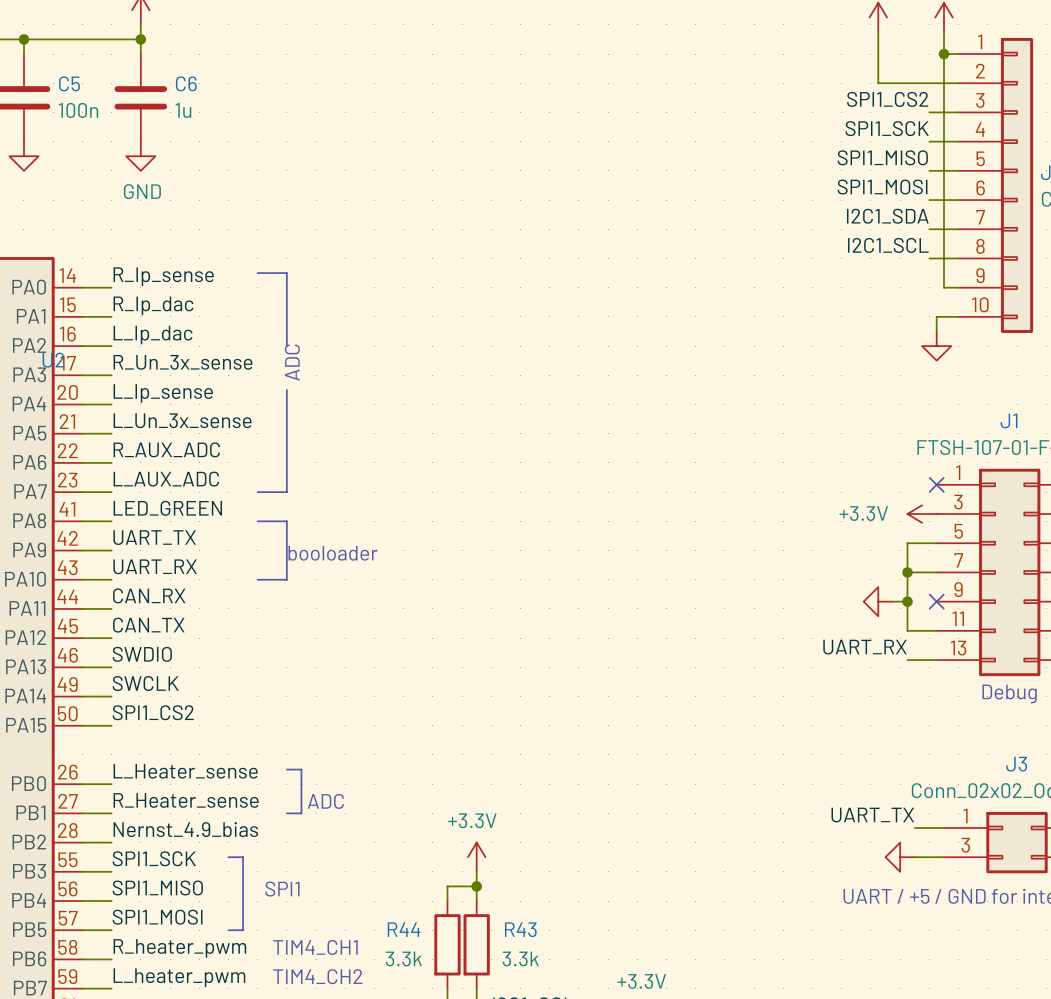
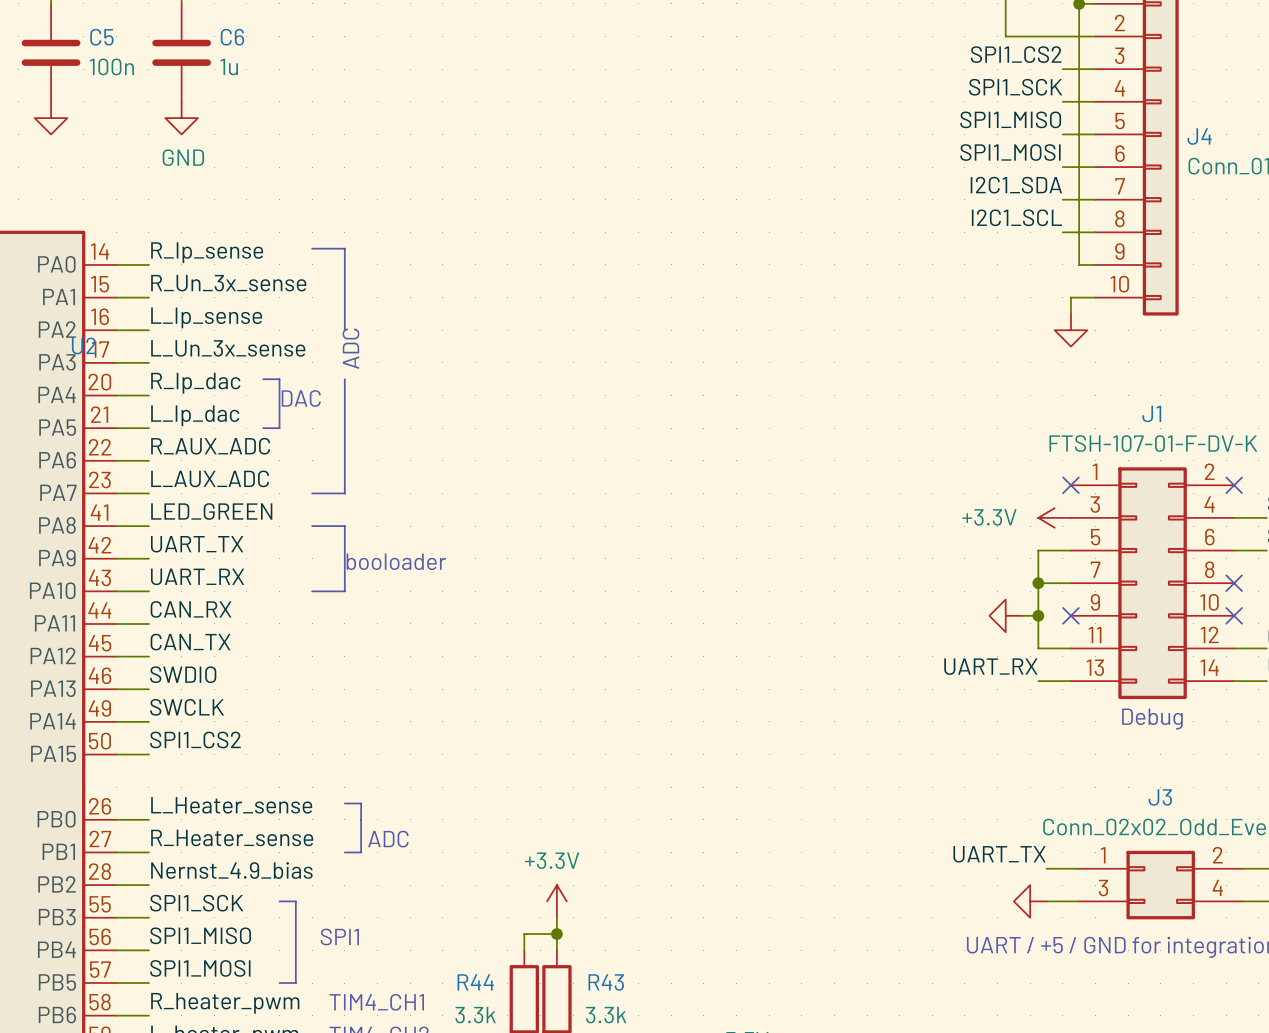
label: R_Ip_dac (153, 305) -> R_Un_3x_sense (228, 283)
label: L_Ip_dac (153, 335) -> L_Ip_sense (206, 317)
label: R_Un_3x_sense (182, 362) -> L_Un_3x_sense (228, 348)
line: none -> (263, 379) (279, 379) (279, 428) (263, 428)
label: L_Ip_sense (163, 393) -> R_Ip_dac (195, 383)
text: none -> DAC (301, 398)
label: L_Un_3x_sense (182, 420) -> L_Ip_dac (195, 415)

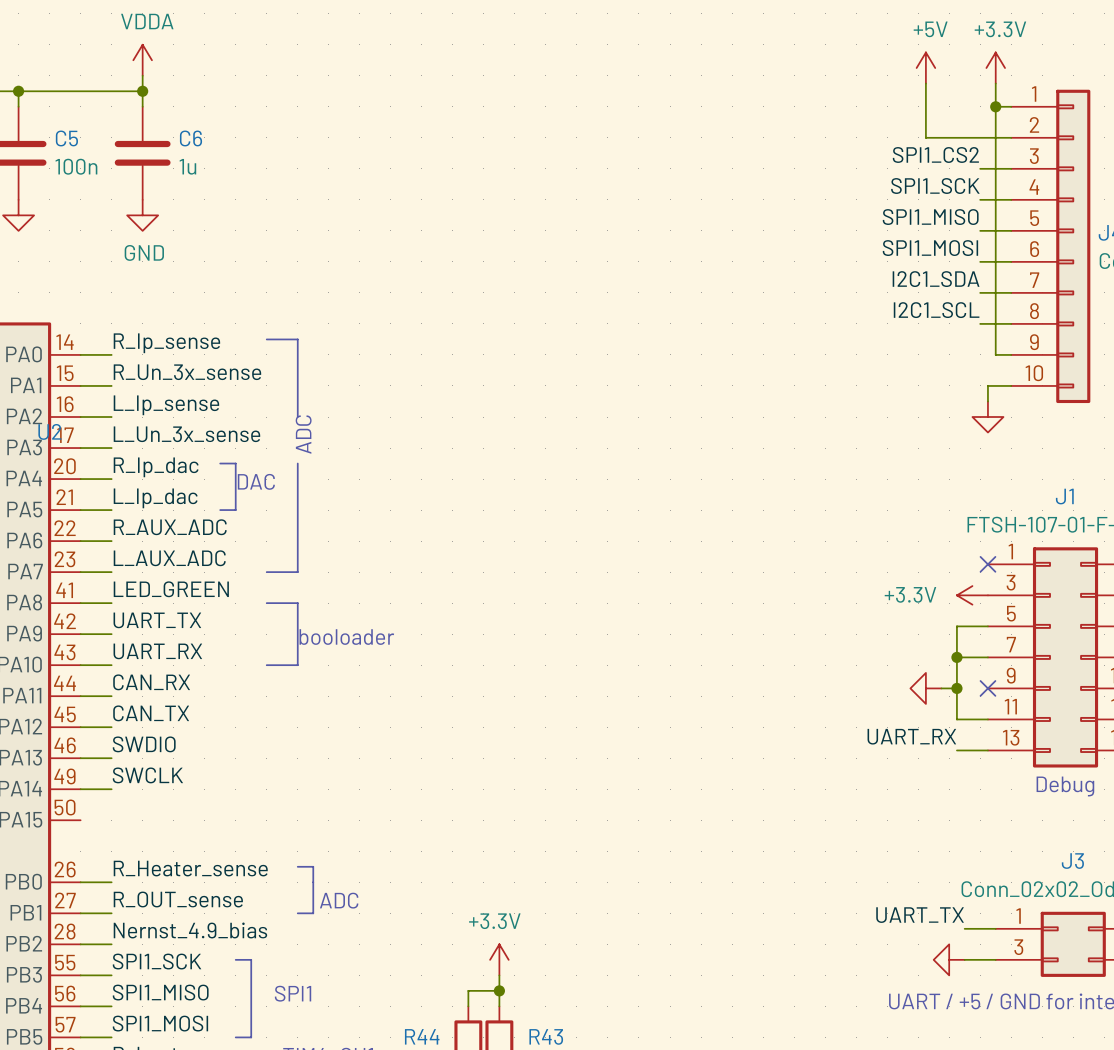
label: SPI1_CS2 (195, 739) -> none
wire: (116, 754) (148, 754) -> none
label: L_Heater_sense (231, 805) -> R_Heater_sense (190, 868)
label: R_Heater_sense (232, 837) -> R_OUT_sense (178, 899)

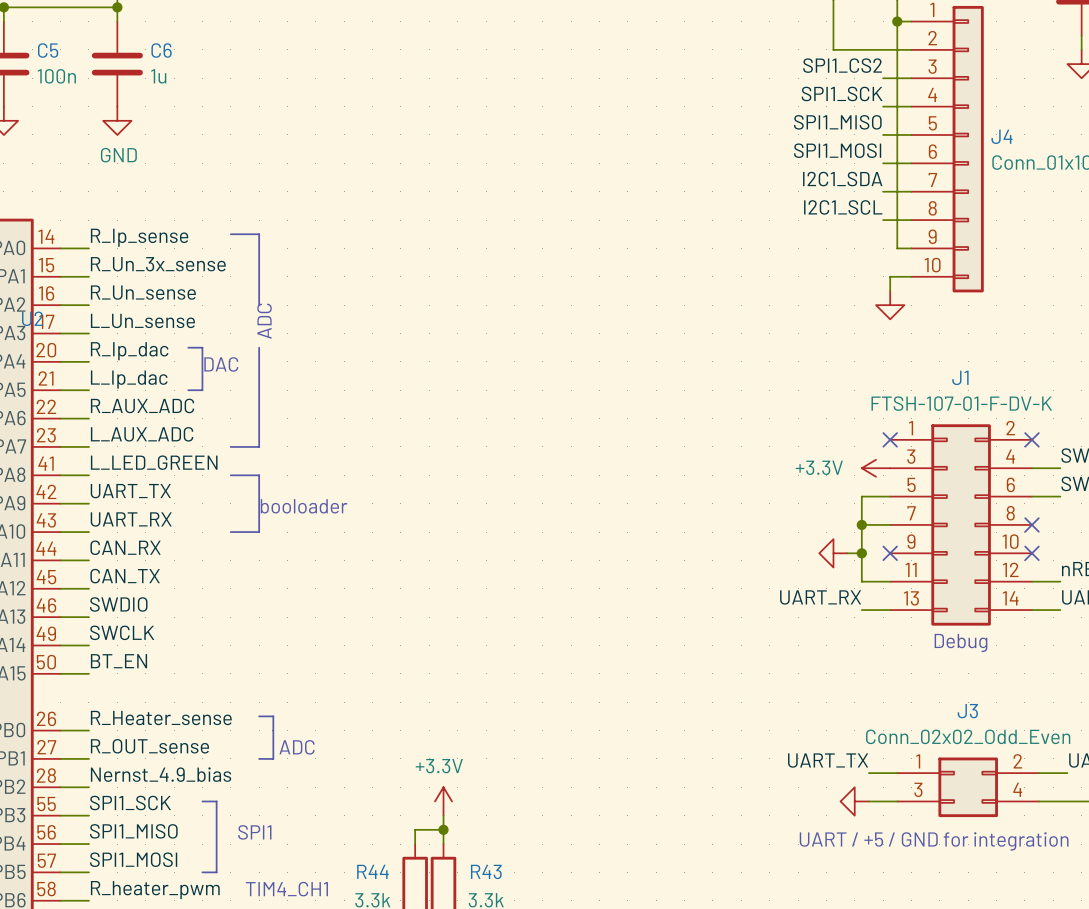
label: L_Ip_sense (166, 405) -> R_Un_sense (143, 292)
label: L_Un_3x_sense (186, 434) -> L_Un_sense (142, 320)
label: LED_GREEN (171, 589) -> L_LED_GREEN (154, 462)
label: none -> BT_EN (118, 661)
wire: none -> (60, 673) (88, 673)

